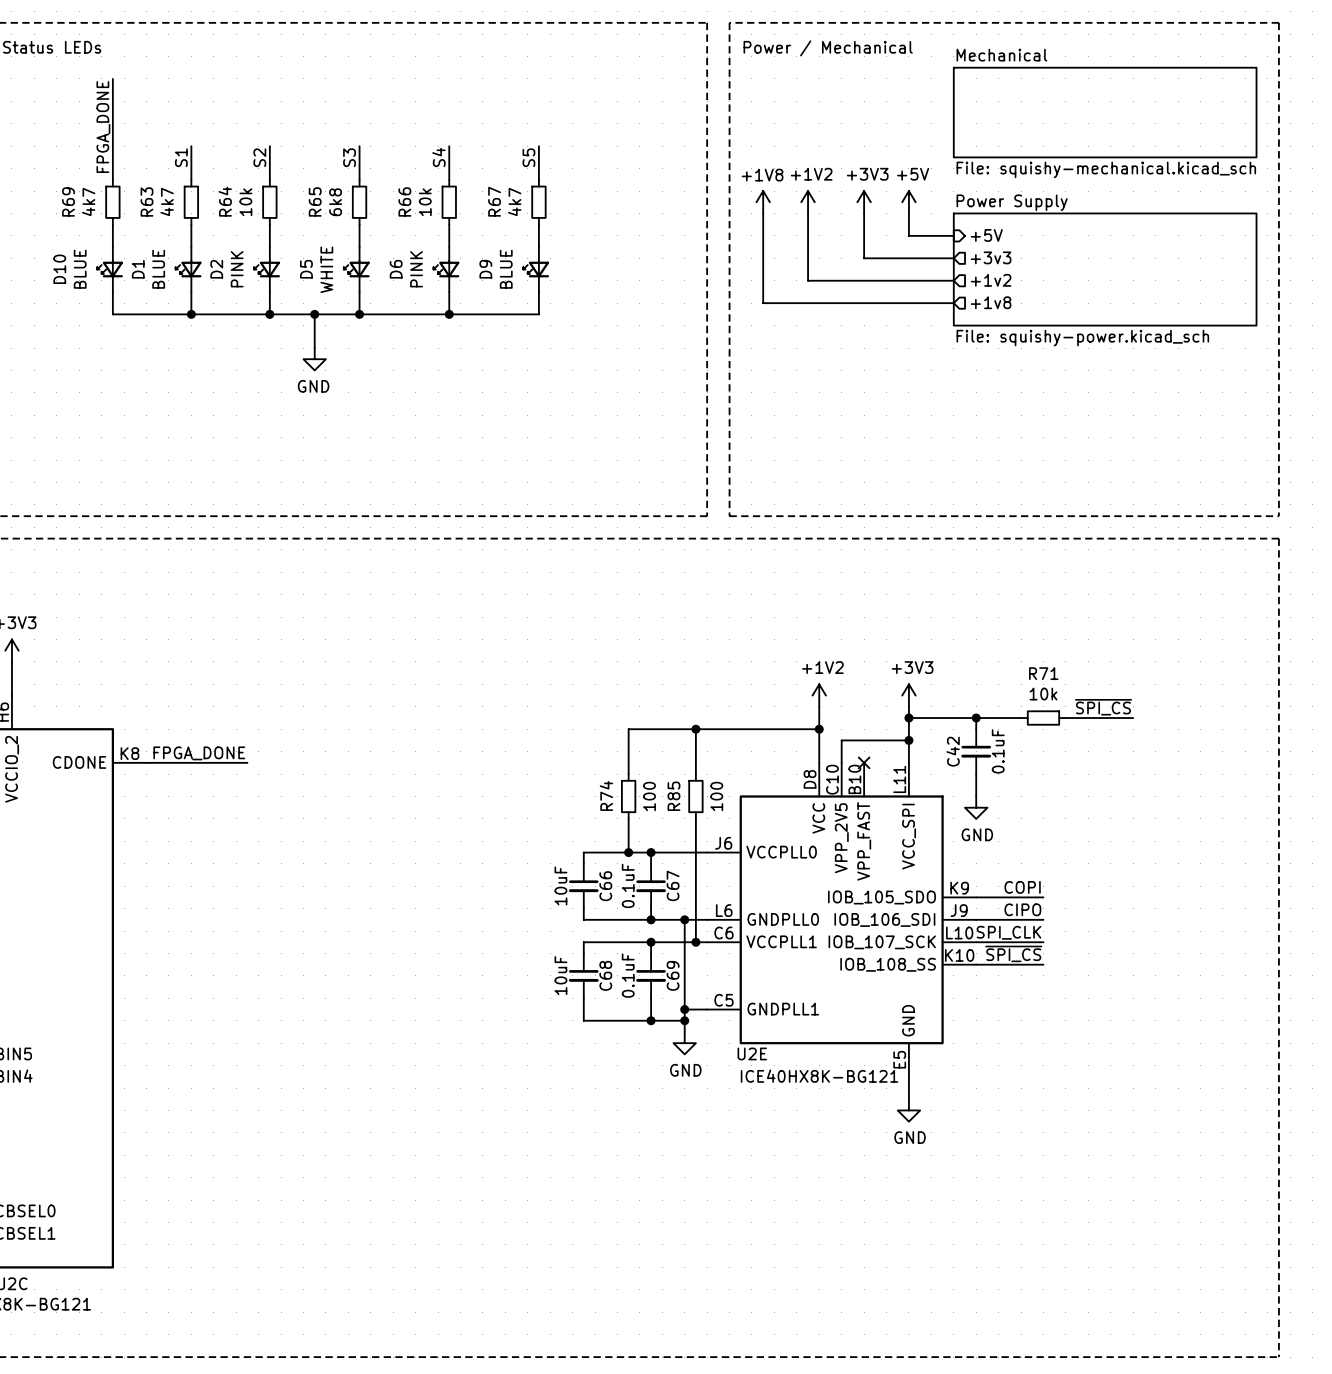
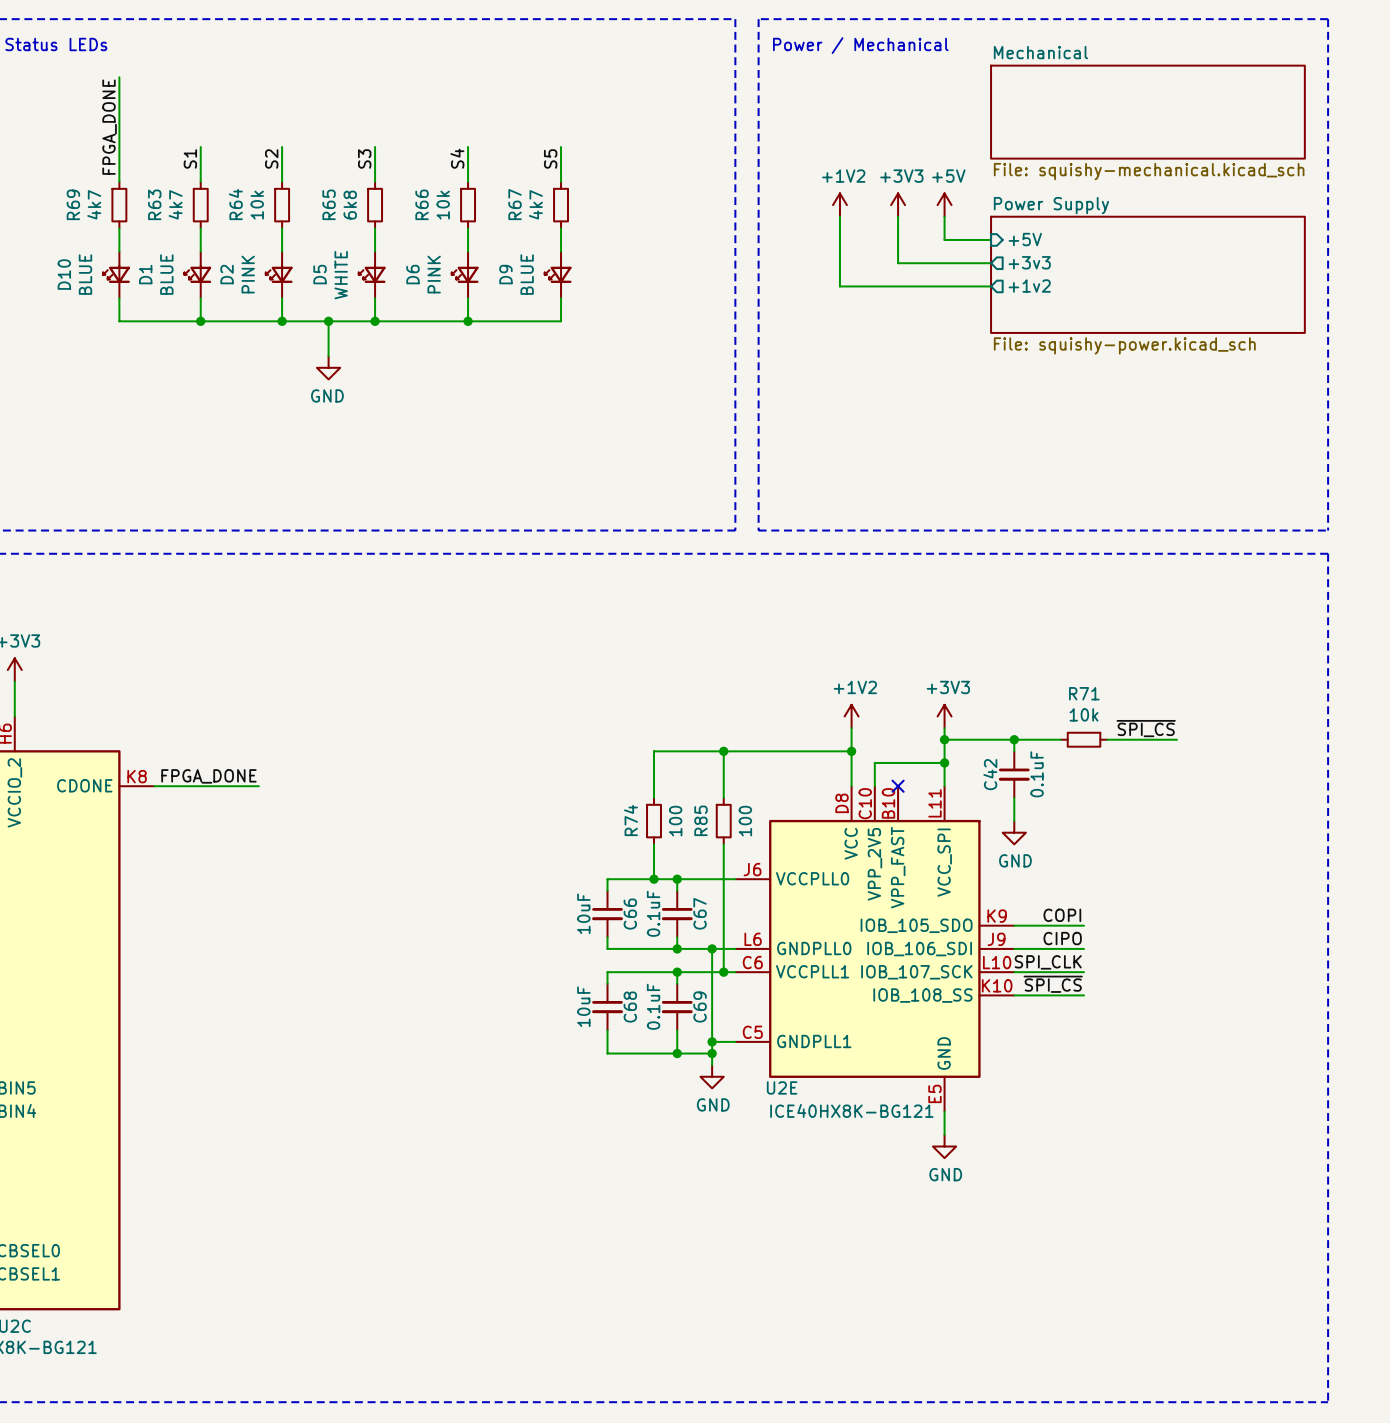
power symbol: +1V8 (763, 202) -> none
wire: (763, 213) (763, 303) (953, 303) -> none
sheet pin: +1v8 (991, 302) -> none

